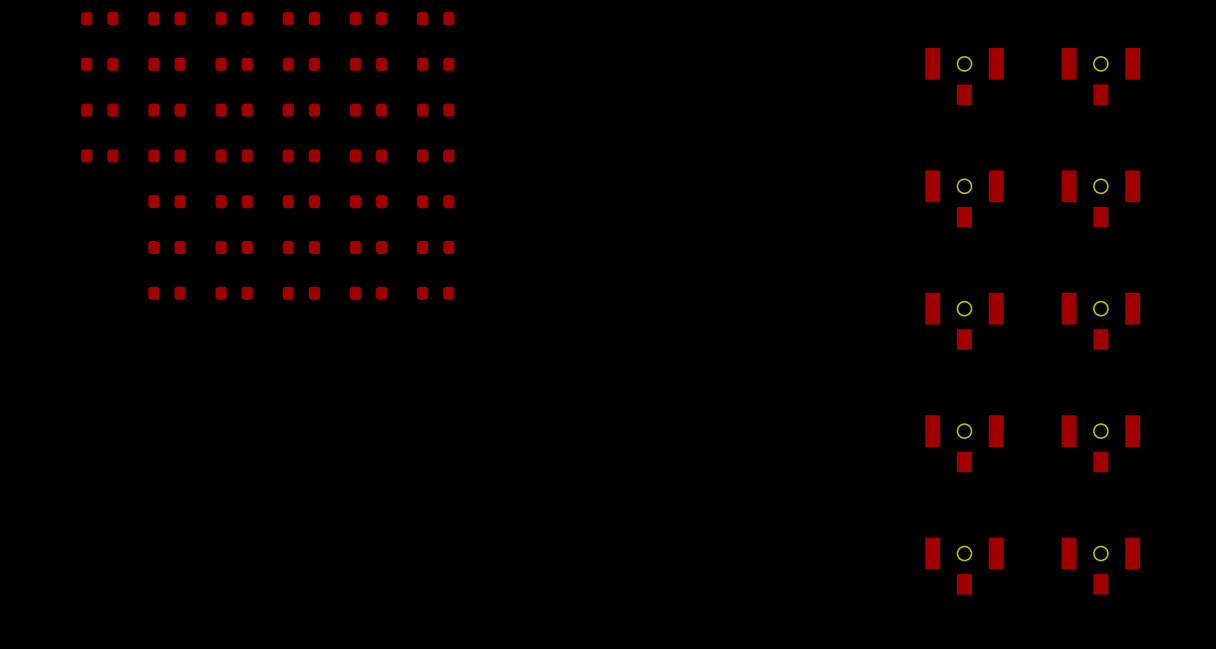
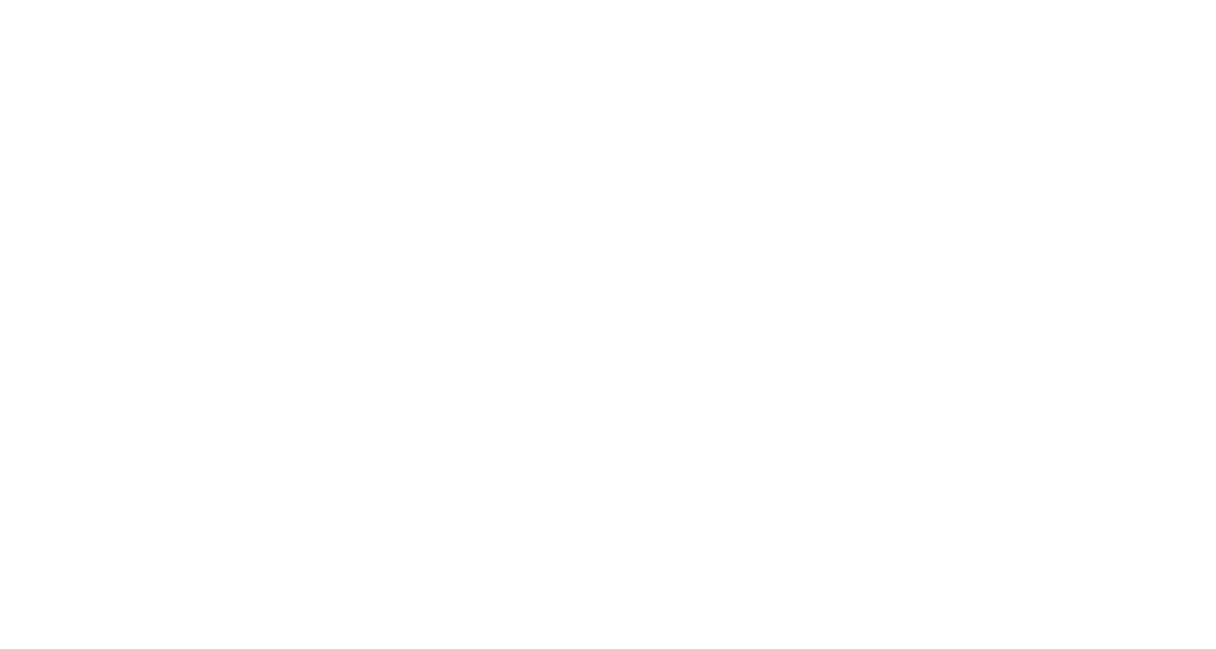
part: (99, 18) -> none
part: (166, 18) -> none
part: (234, 18) -> none
part: (301, 18) -> none
part: (368, 18) -> none
part: (435, 18) -> none
part: (99, 64) -> none
part: (166, 64) -> none
part: (234, 64) -> none
part: (301, 64) -> none
part: (368, 64) -> none
part: (435, 64) -> none
part: (964, 76) -> none
part: (1100, 76) -> none
part: (99, 110) -> none
part: (166, 110) -> none
part: (234, 110) -> none
part: (301, 110) -> none
part: (368, 110) -> none
part: (435, 110) -> none
part: (99, 155) -> none
part: (166, 155) -> none
part: (234, 155) -> none
part: (301, 155) -> none
part: (368, 155) -> none
part: (435, 155) -> none
part: (964, 198) -> none
part: (1100, 198) -> none
part: (166, 201) -> none
part: (234, 201) -> none
part: (301, 201) -> none
part: (368, 201) -> none
part: (435, 201) -> none
part: (166, 247) -> none
part: (234, 247) -> none
part: (301, 247) -> none
part: (368, 247) -> none
part: (435, 247) -> none
part: (166, 293) -> none
part: (234, 293) -> none
part: (301, 293) -> none
part: (368, 293) -> none
part: (435, 293) -> none
part: (964, 321) -> none
part: (1100, 321) -> none
part: (964, 443) -> none
part: (1100, 443) -> none
part: (964, 566) -> none
part: (1100, 566) -> none

